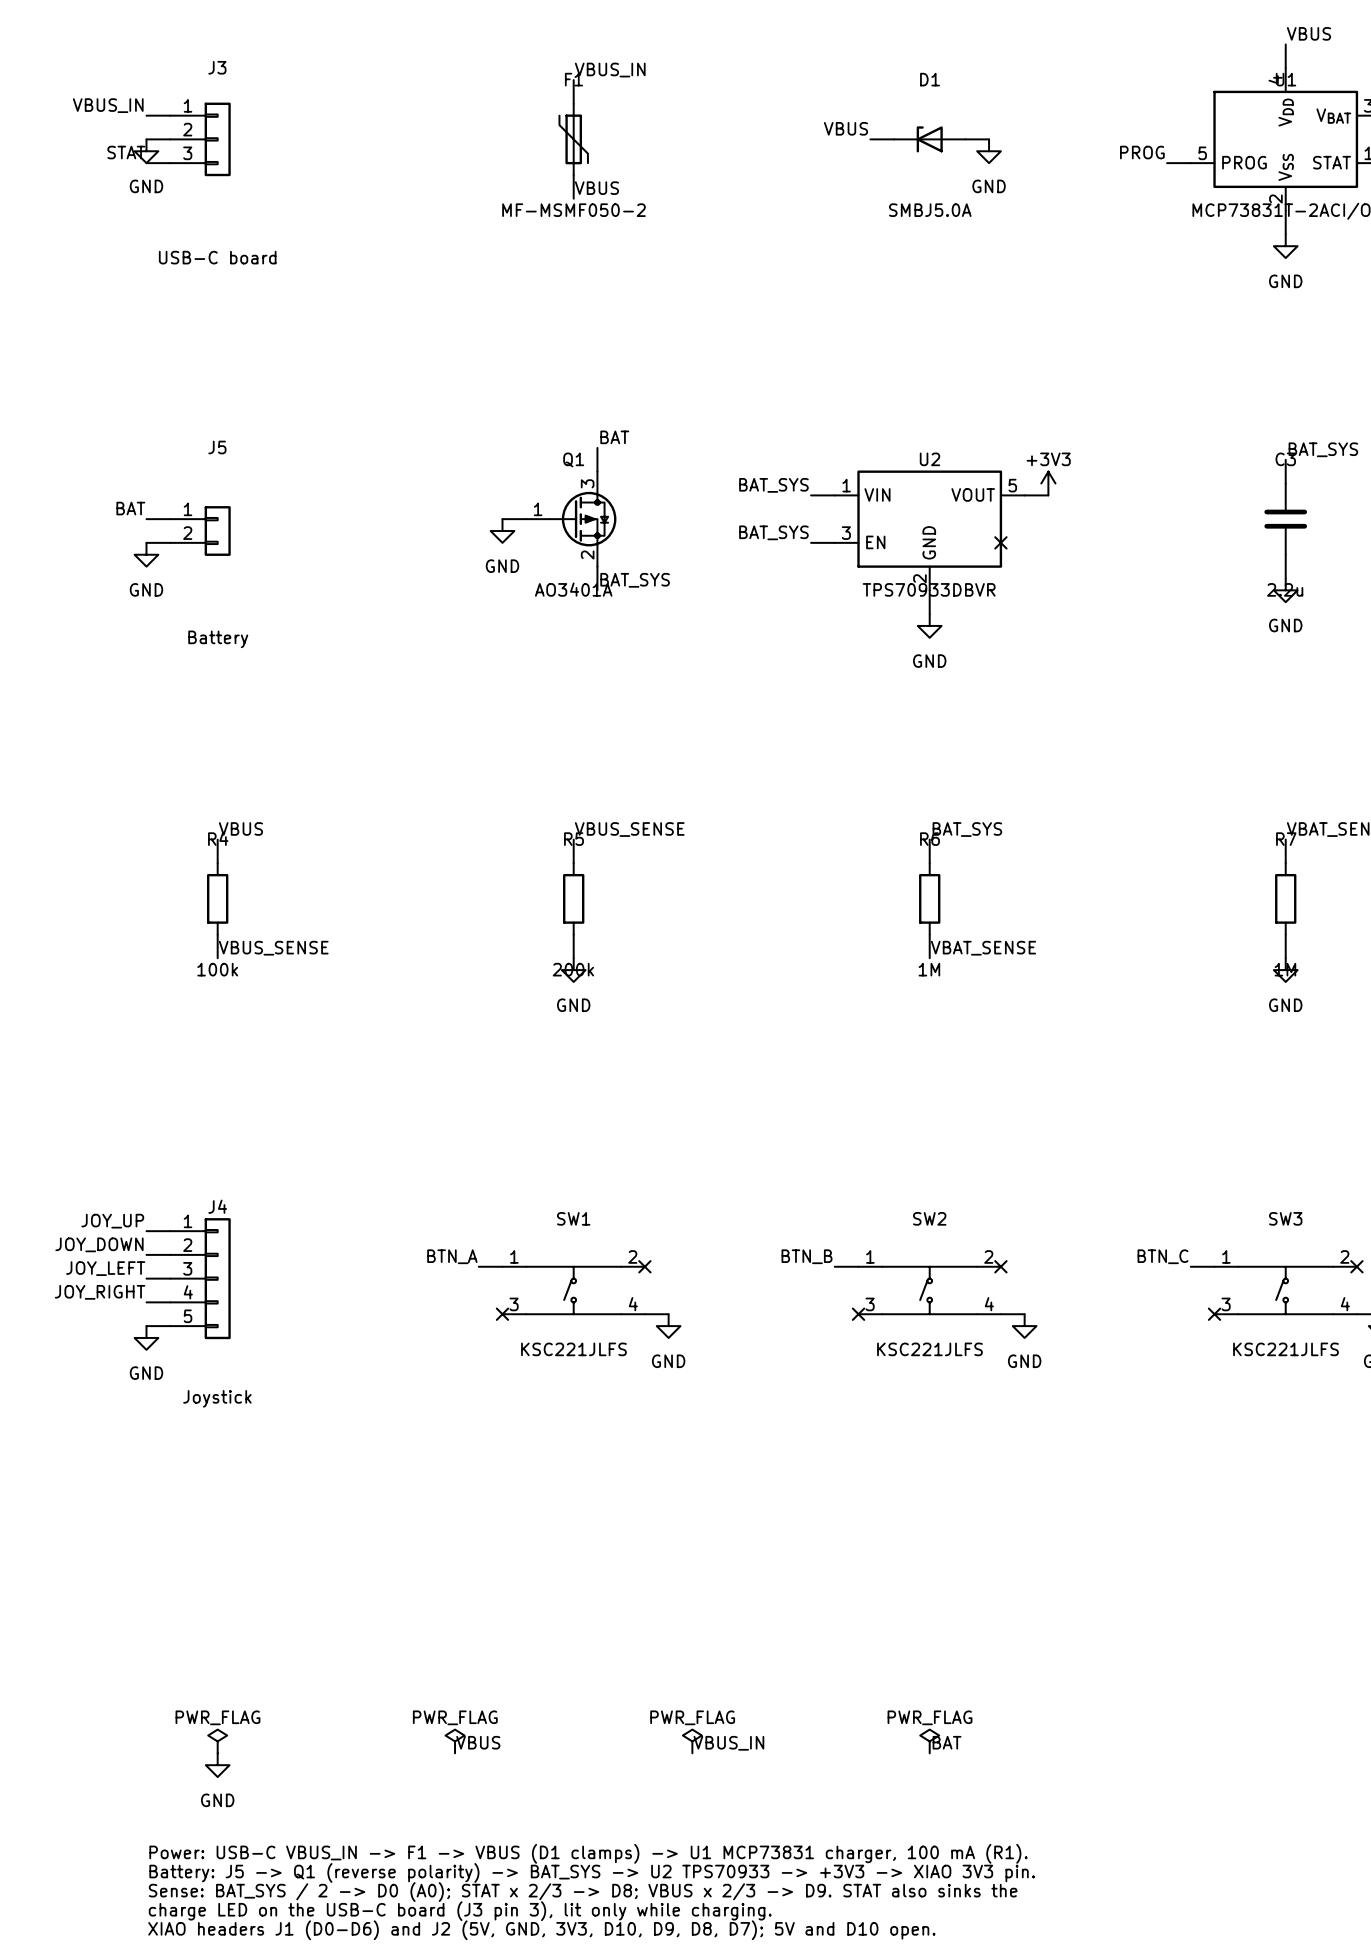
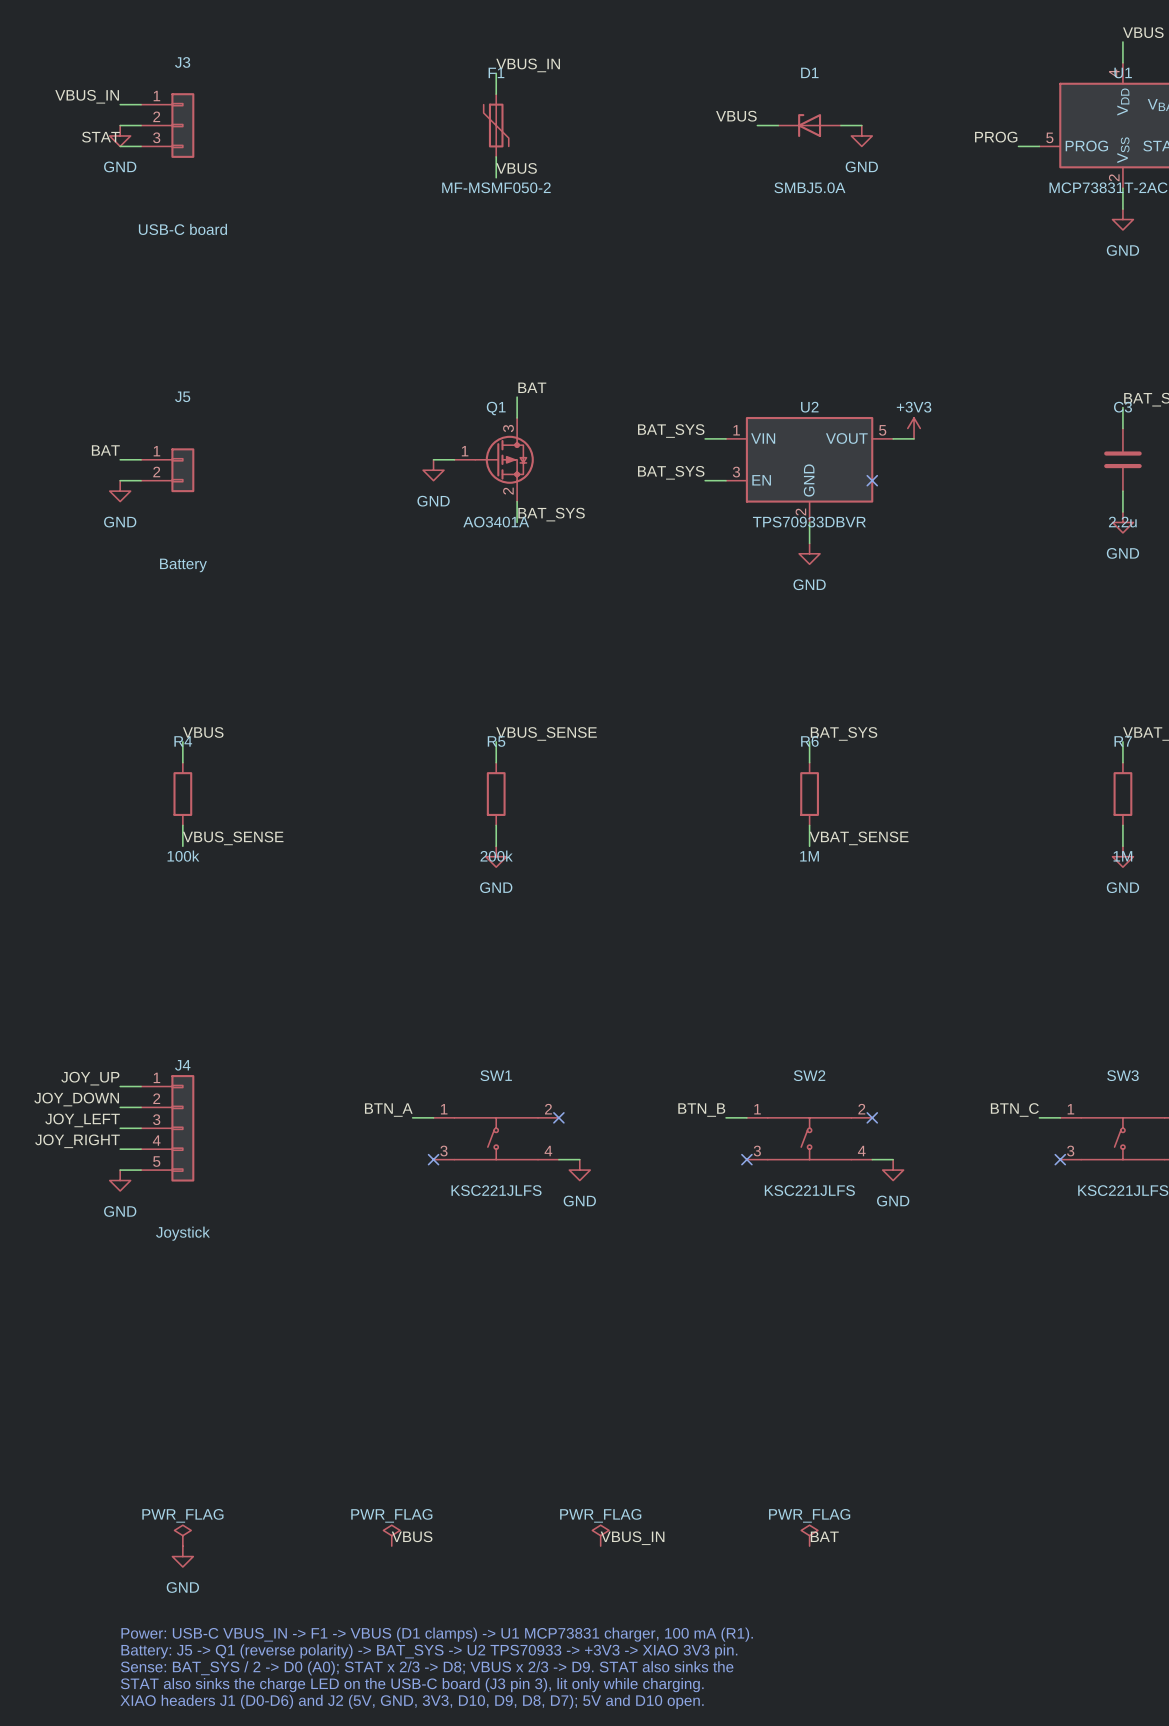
text: charge LED on the USB-C board (J3 pin 3), lit only while charging. (460, 1911) -> STAT also sinks the charge LED on the USB-C board (J3 pin 3), lit only while charging. (412, 1685)

